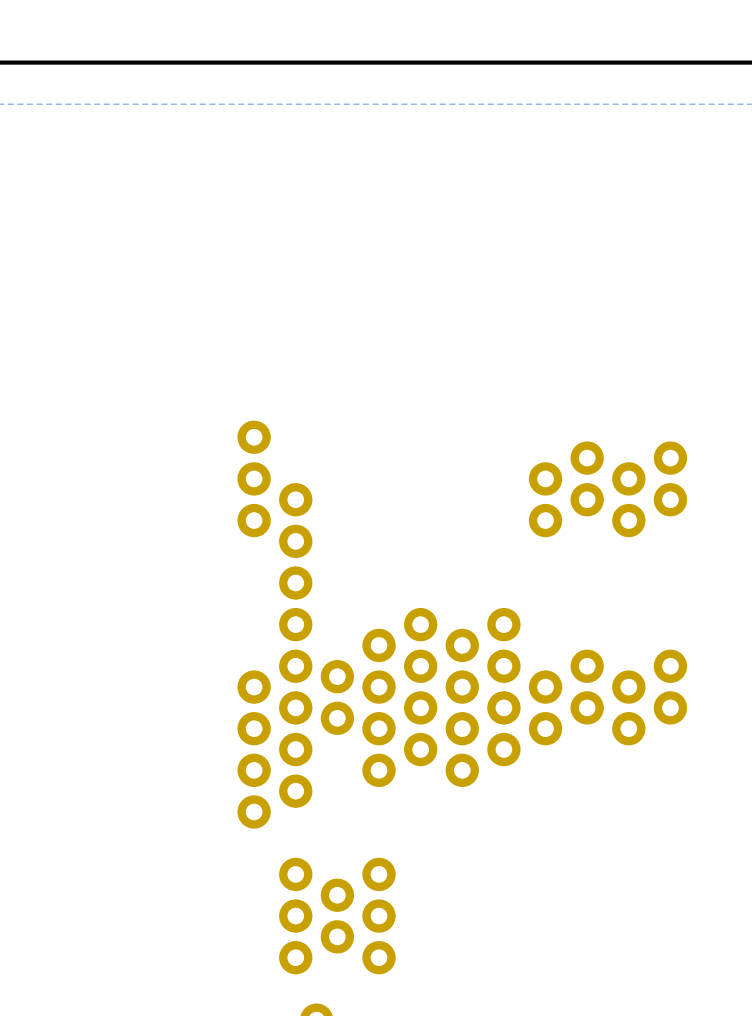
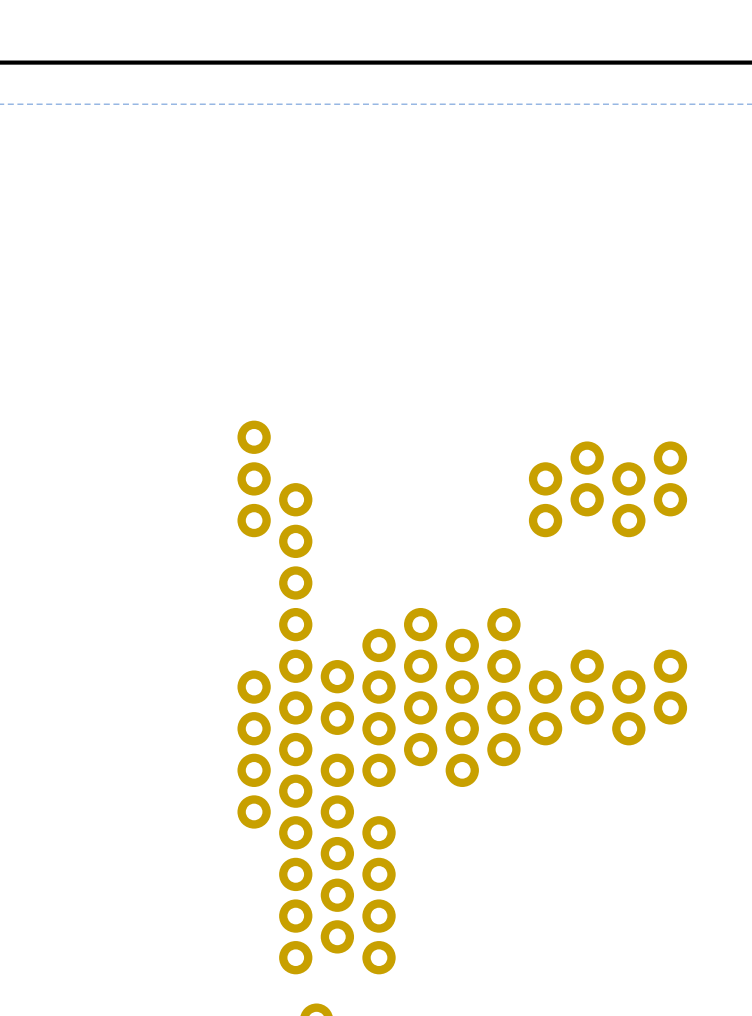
part: none -> (337, 770)
part: none -> (337, 811)
part: none -> (295, 832)
part: none -> (379, 832)
part: none -> (337, 853)

